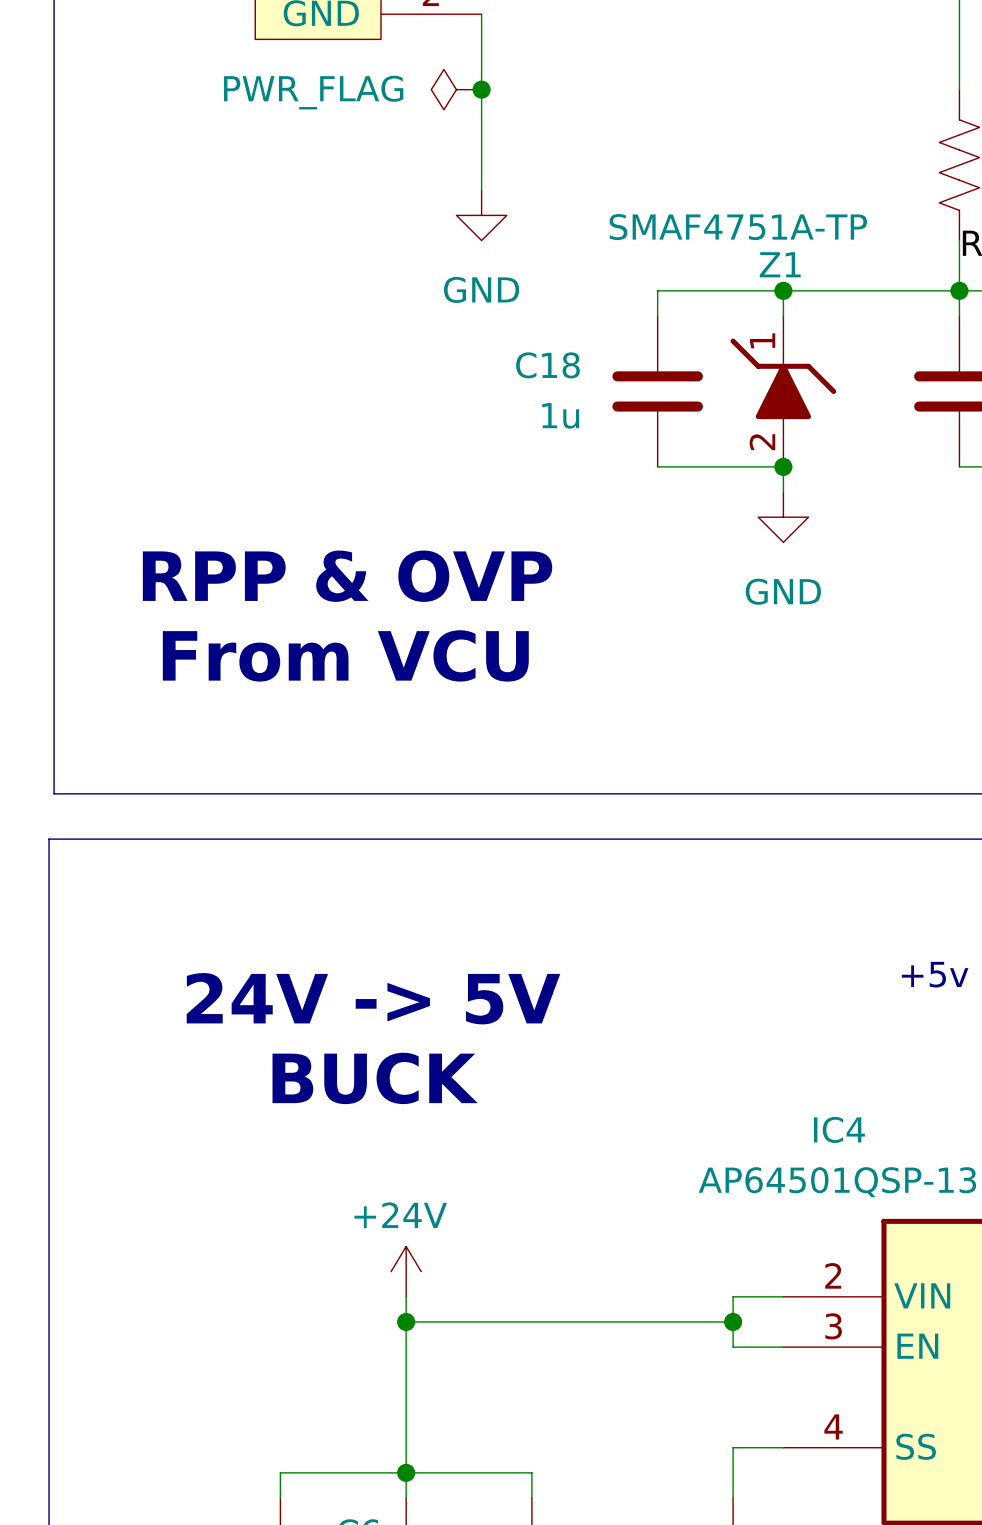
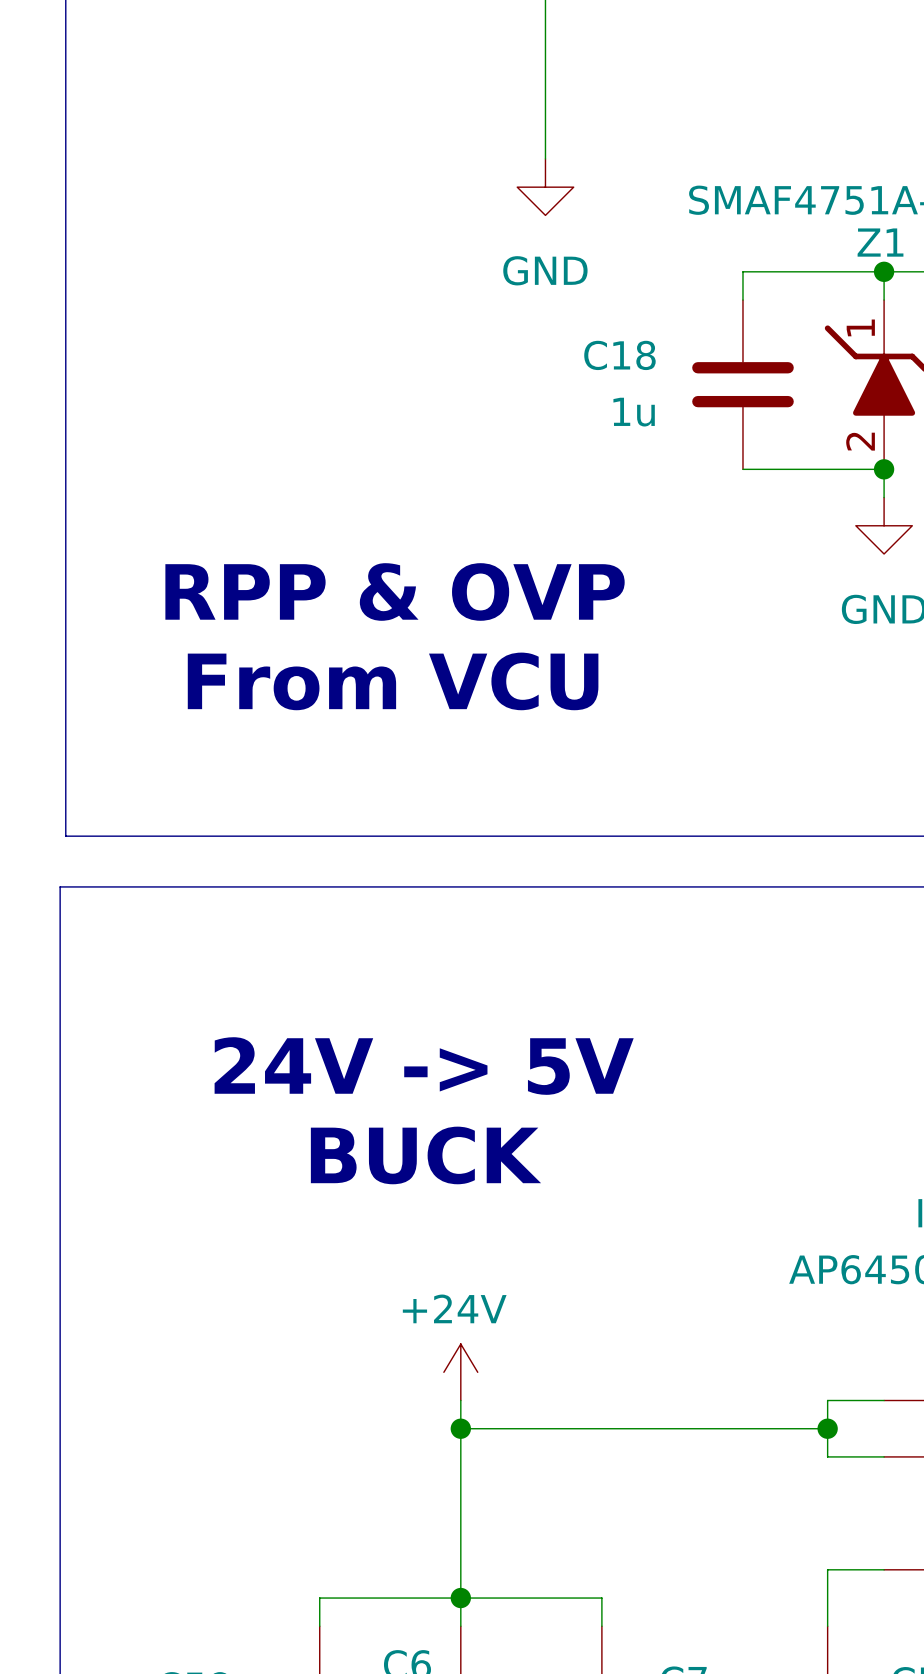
power symbol: PWR_FLAG (456, 89) -> none
junction: (481, 89) -> none

